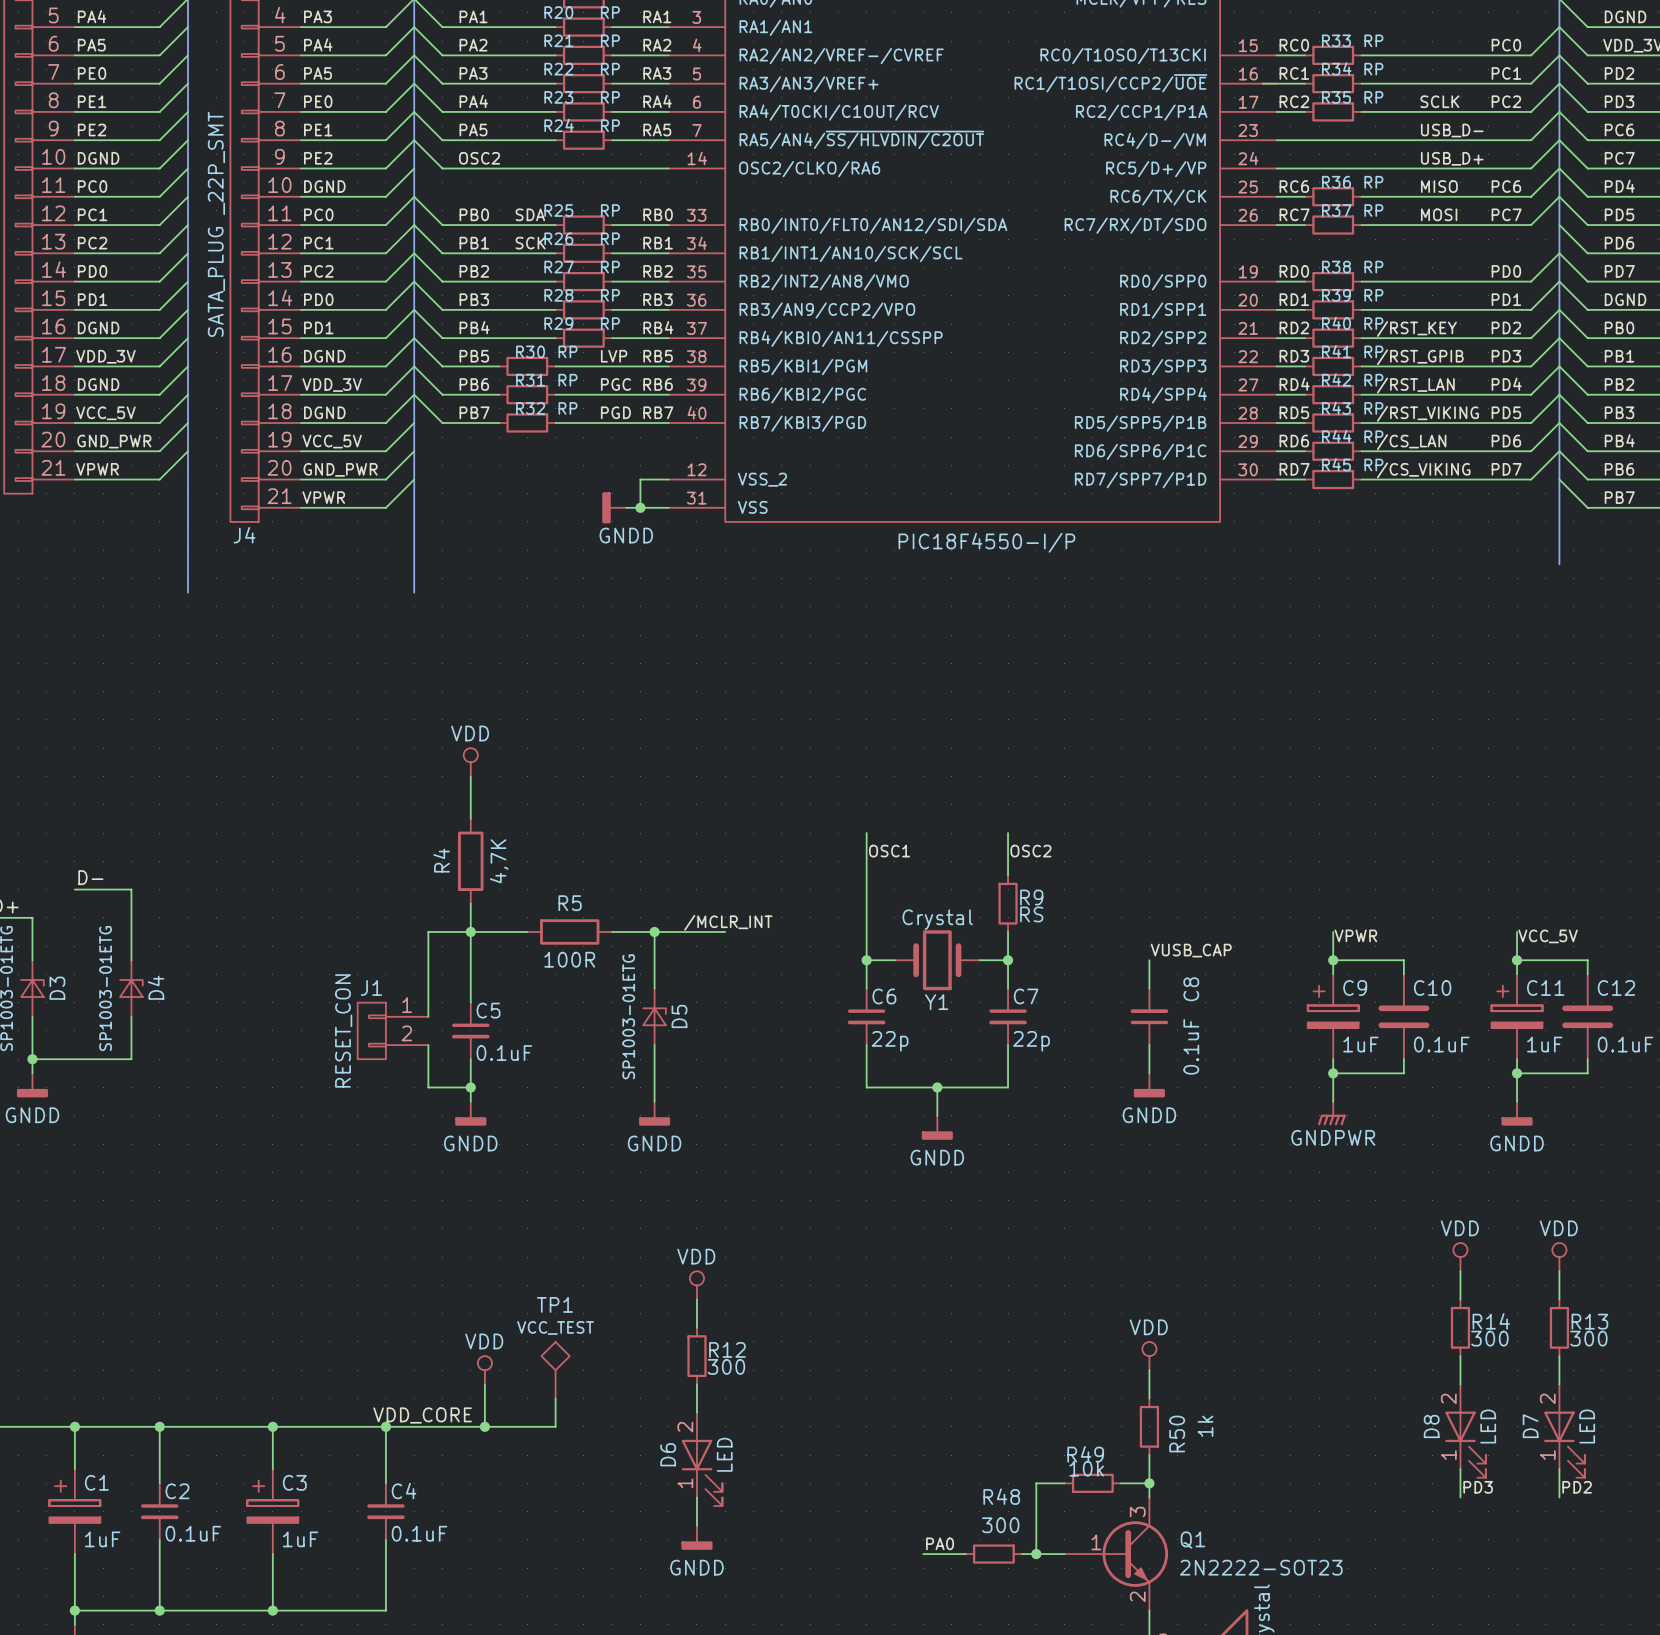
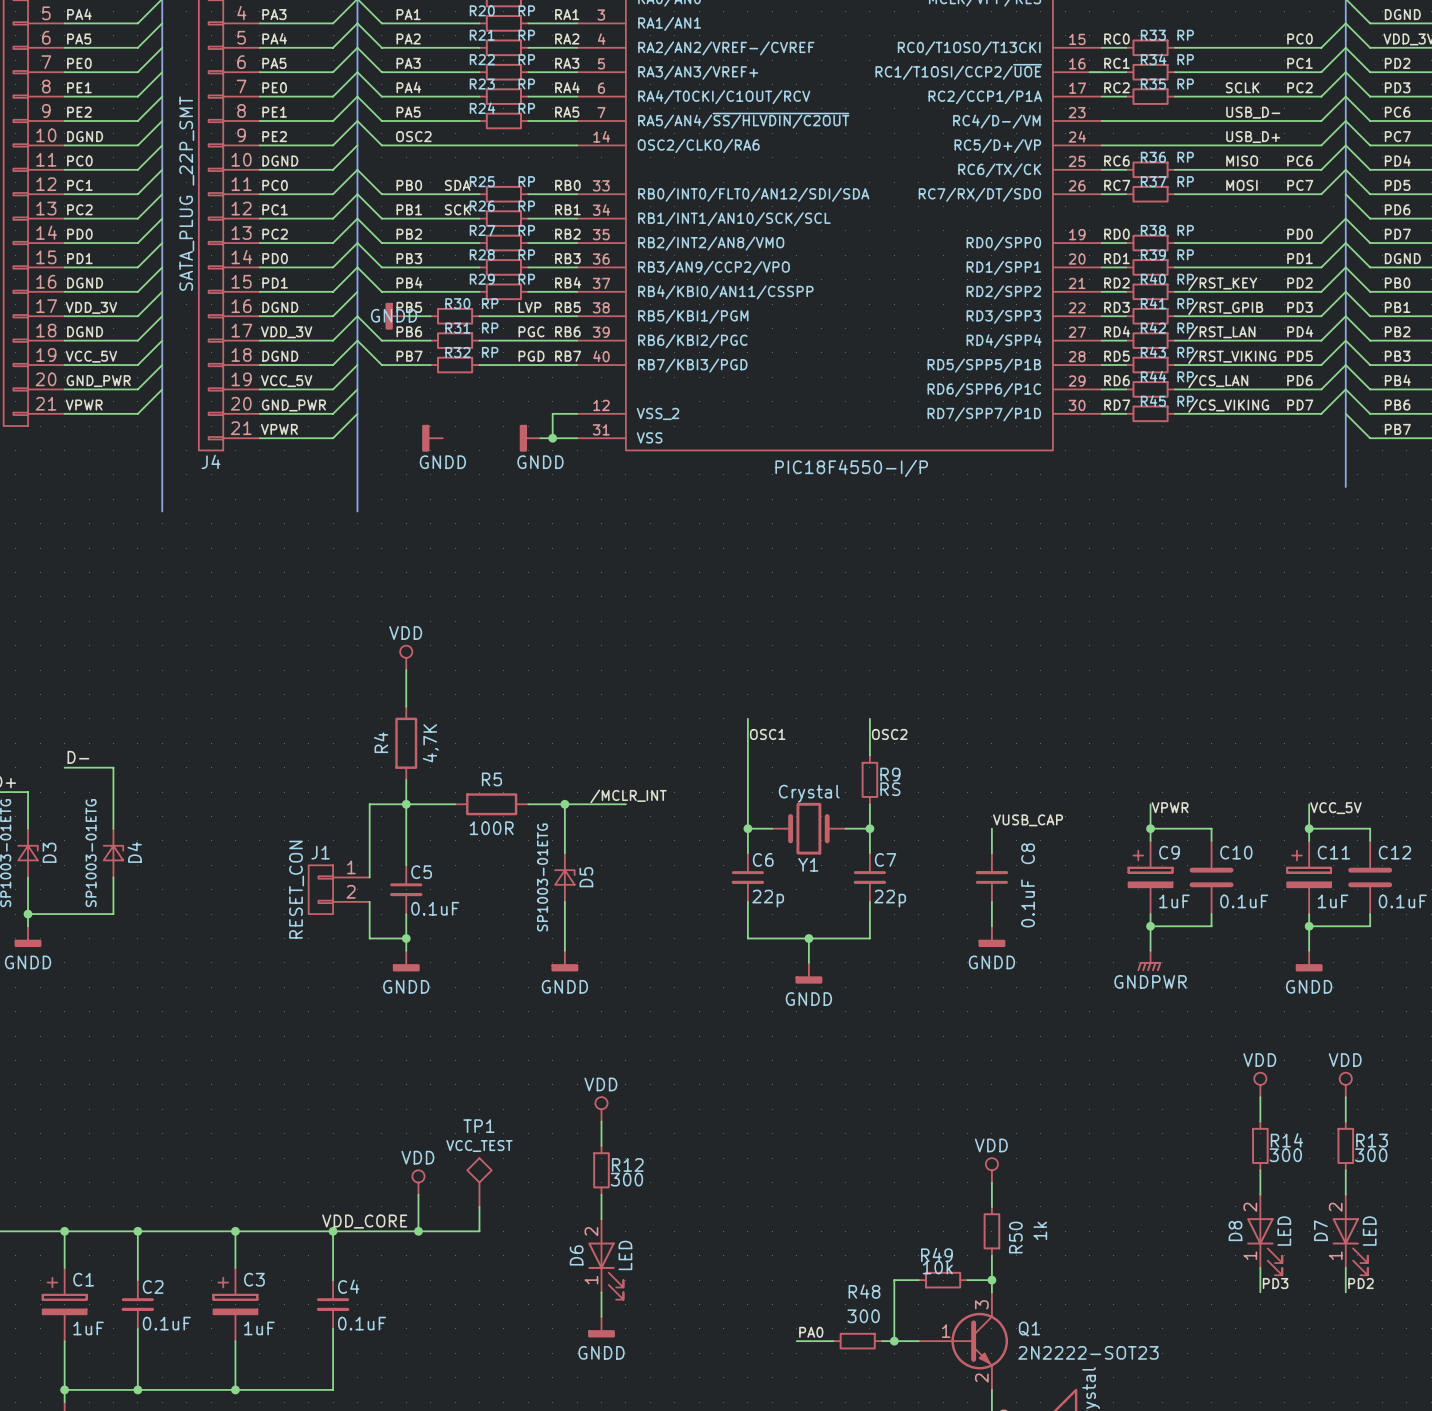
wire: (414, 338) (442, 366) (470, 366) -> none
power symbol: none -> GNDD (395, 316)
power symbol: none -> GNDD (432, 438)

